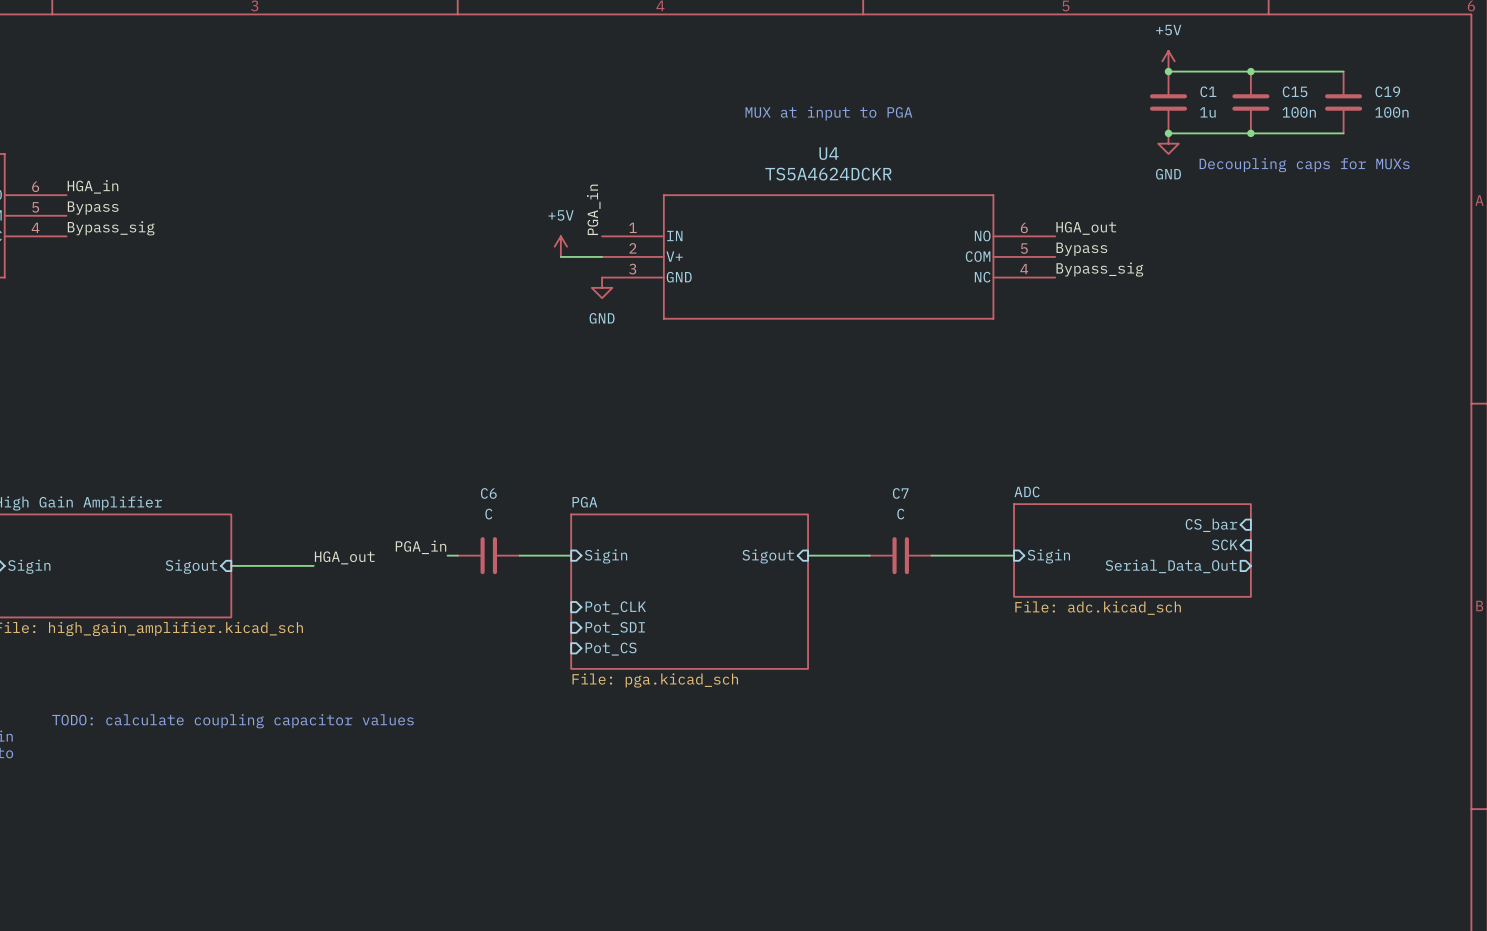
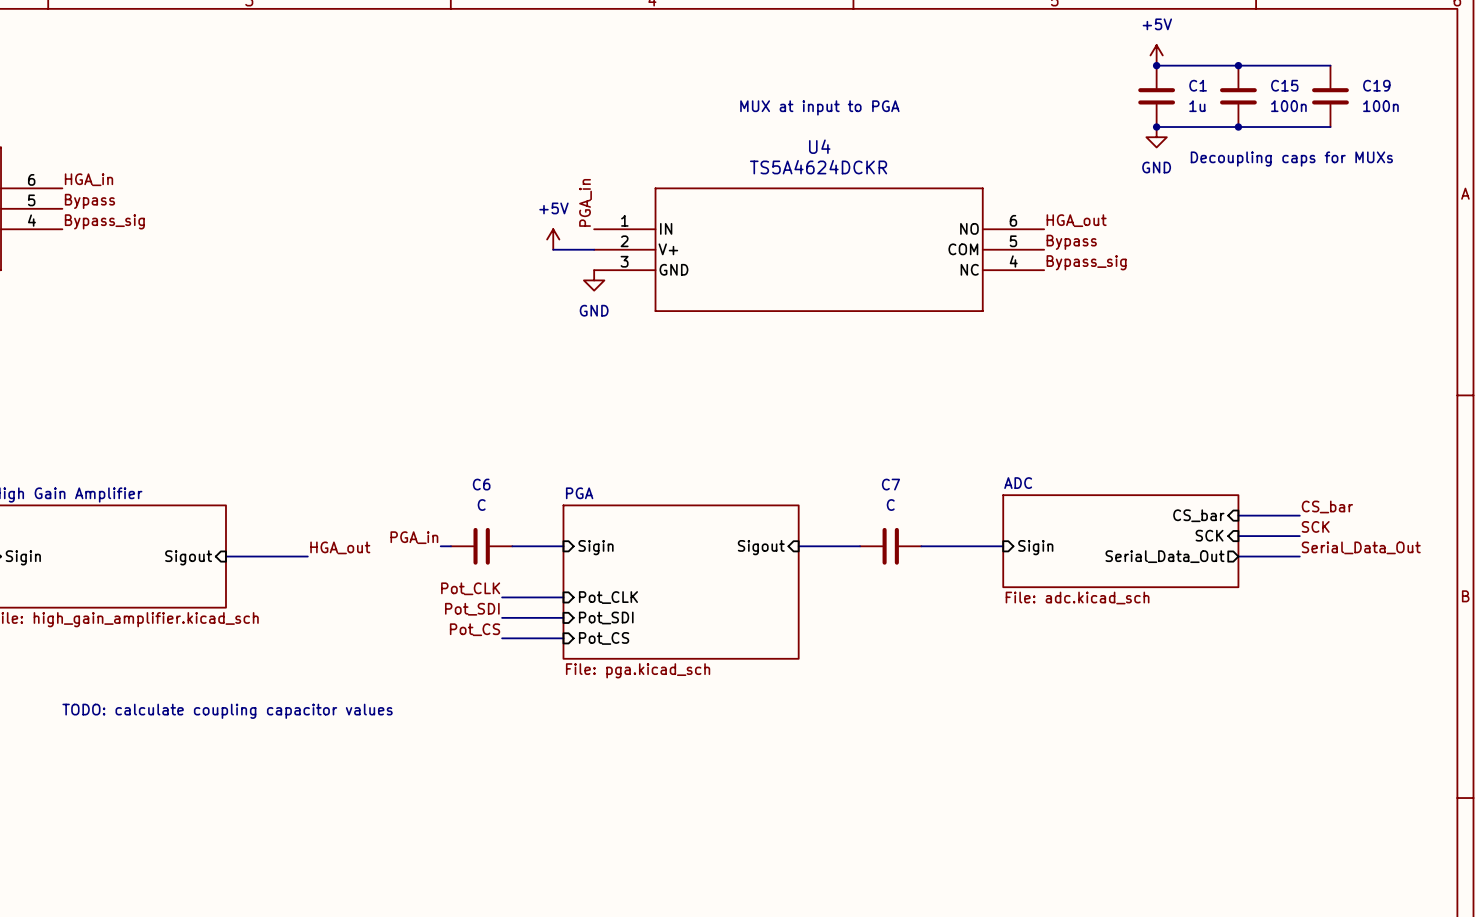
label: none -> CS_bar (1327, 506)
wire: none -> (1238, 515) (1299, 515)
label: none -> SCK (1315, 526)
wire: none -> (1238, 536) (1299, 536)
label: none -> Serial_Data_Out (1361, 547)
wire: none -> (1238, 556) (1299, 556)
label: none -> Pot_CLK (470, 588)
wire: none -> (502, 597) (563, 597)
label: none -> Pot_SDI (472, 609)
wire: none -> (502, 617) (563, 617)
label: none -> Pot_CS (475, 629)
wire: none -> (502, 638) (563, 638)

